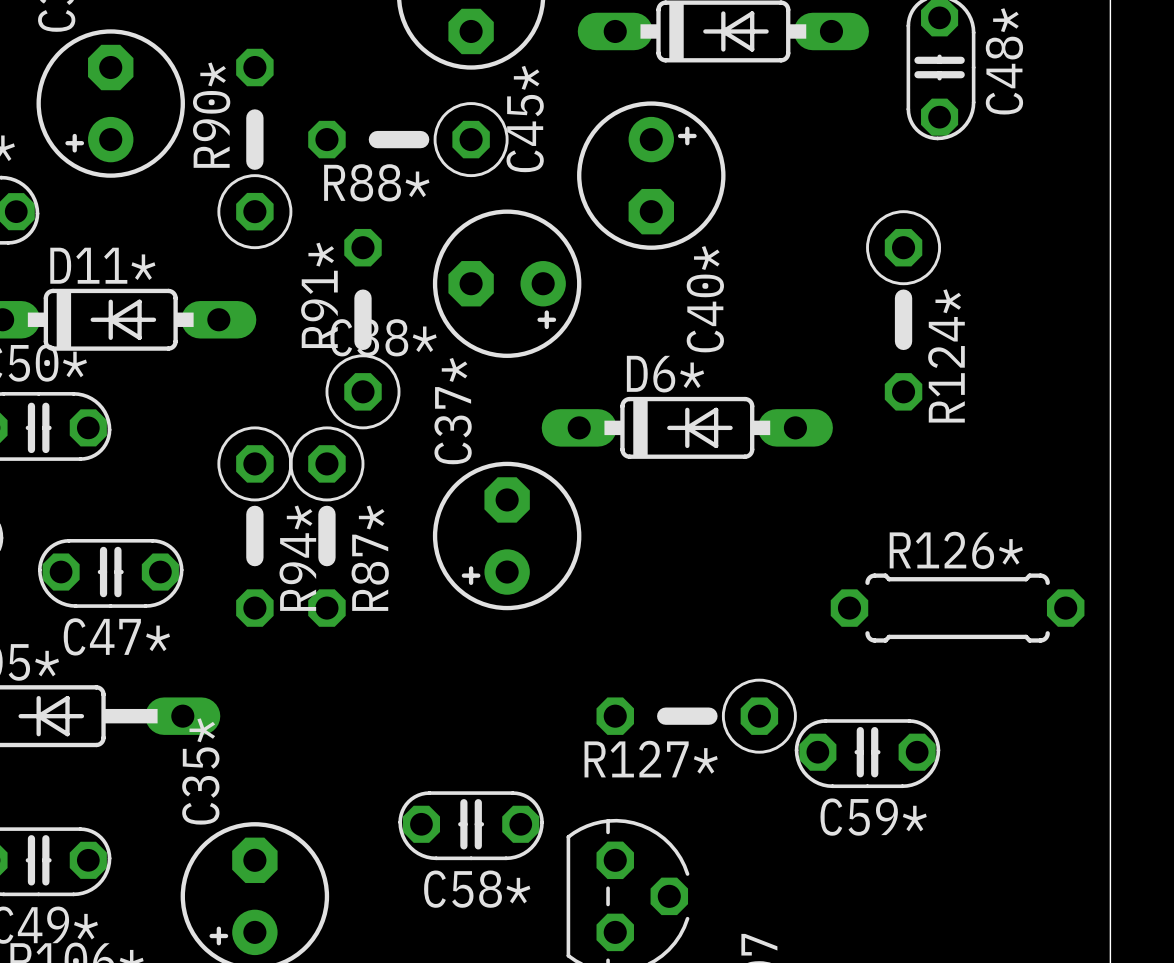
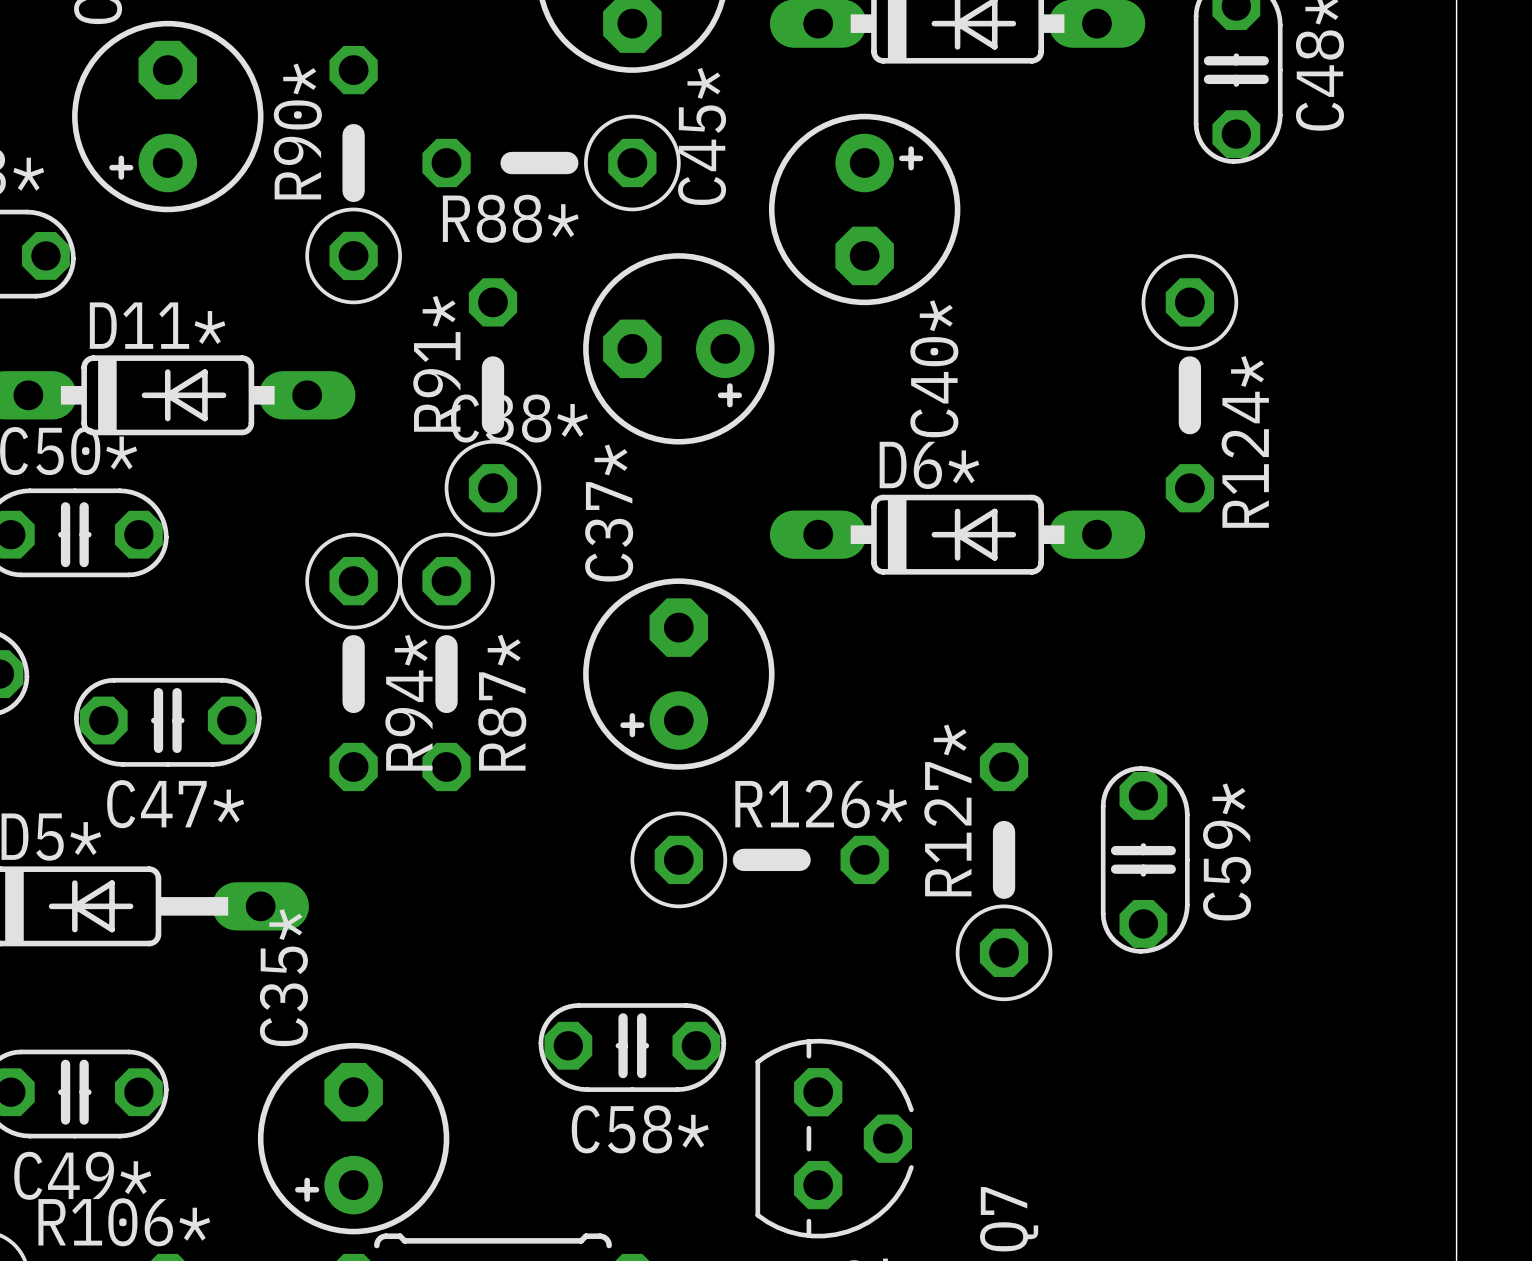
D6* position: (687, 427) -> (957, 534)
R126* footprint: [830, 573, 1085, 643] -> [630, 811, 889, 909]
R127* rotation: 0° (696, 716) -> 90° clockwise (1004, 871)
C59* rotation: 0° (867, 753) -> 90° counterclockwise (1145, 859)

